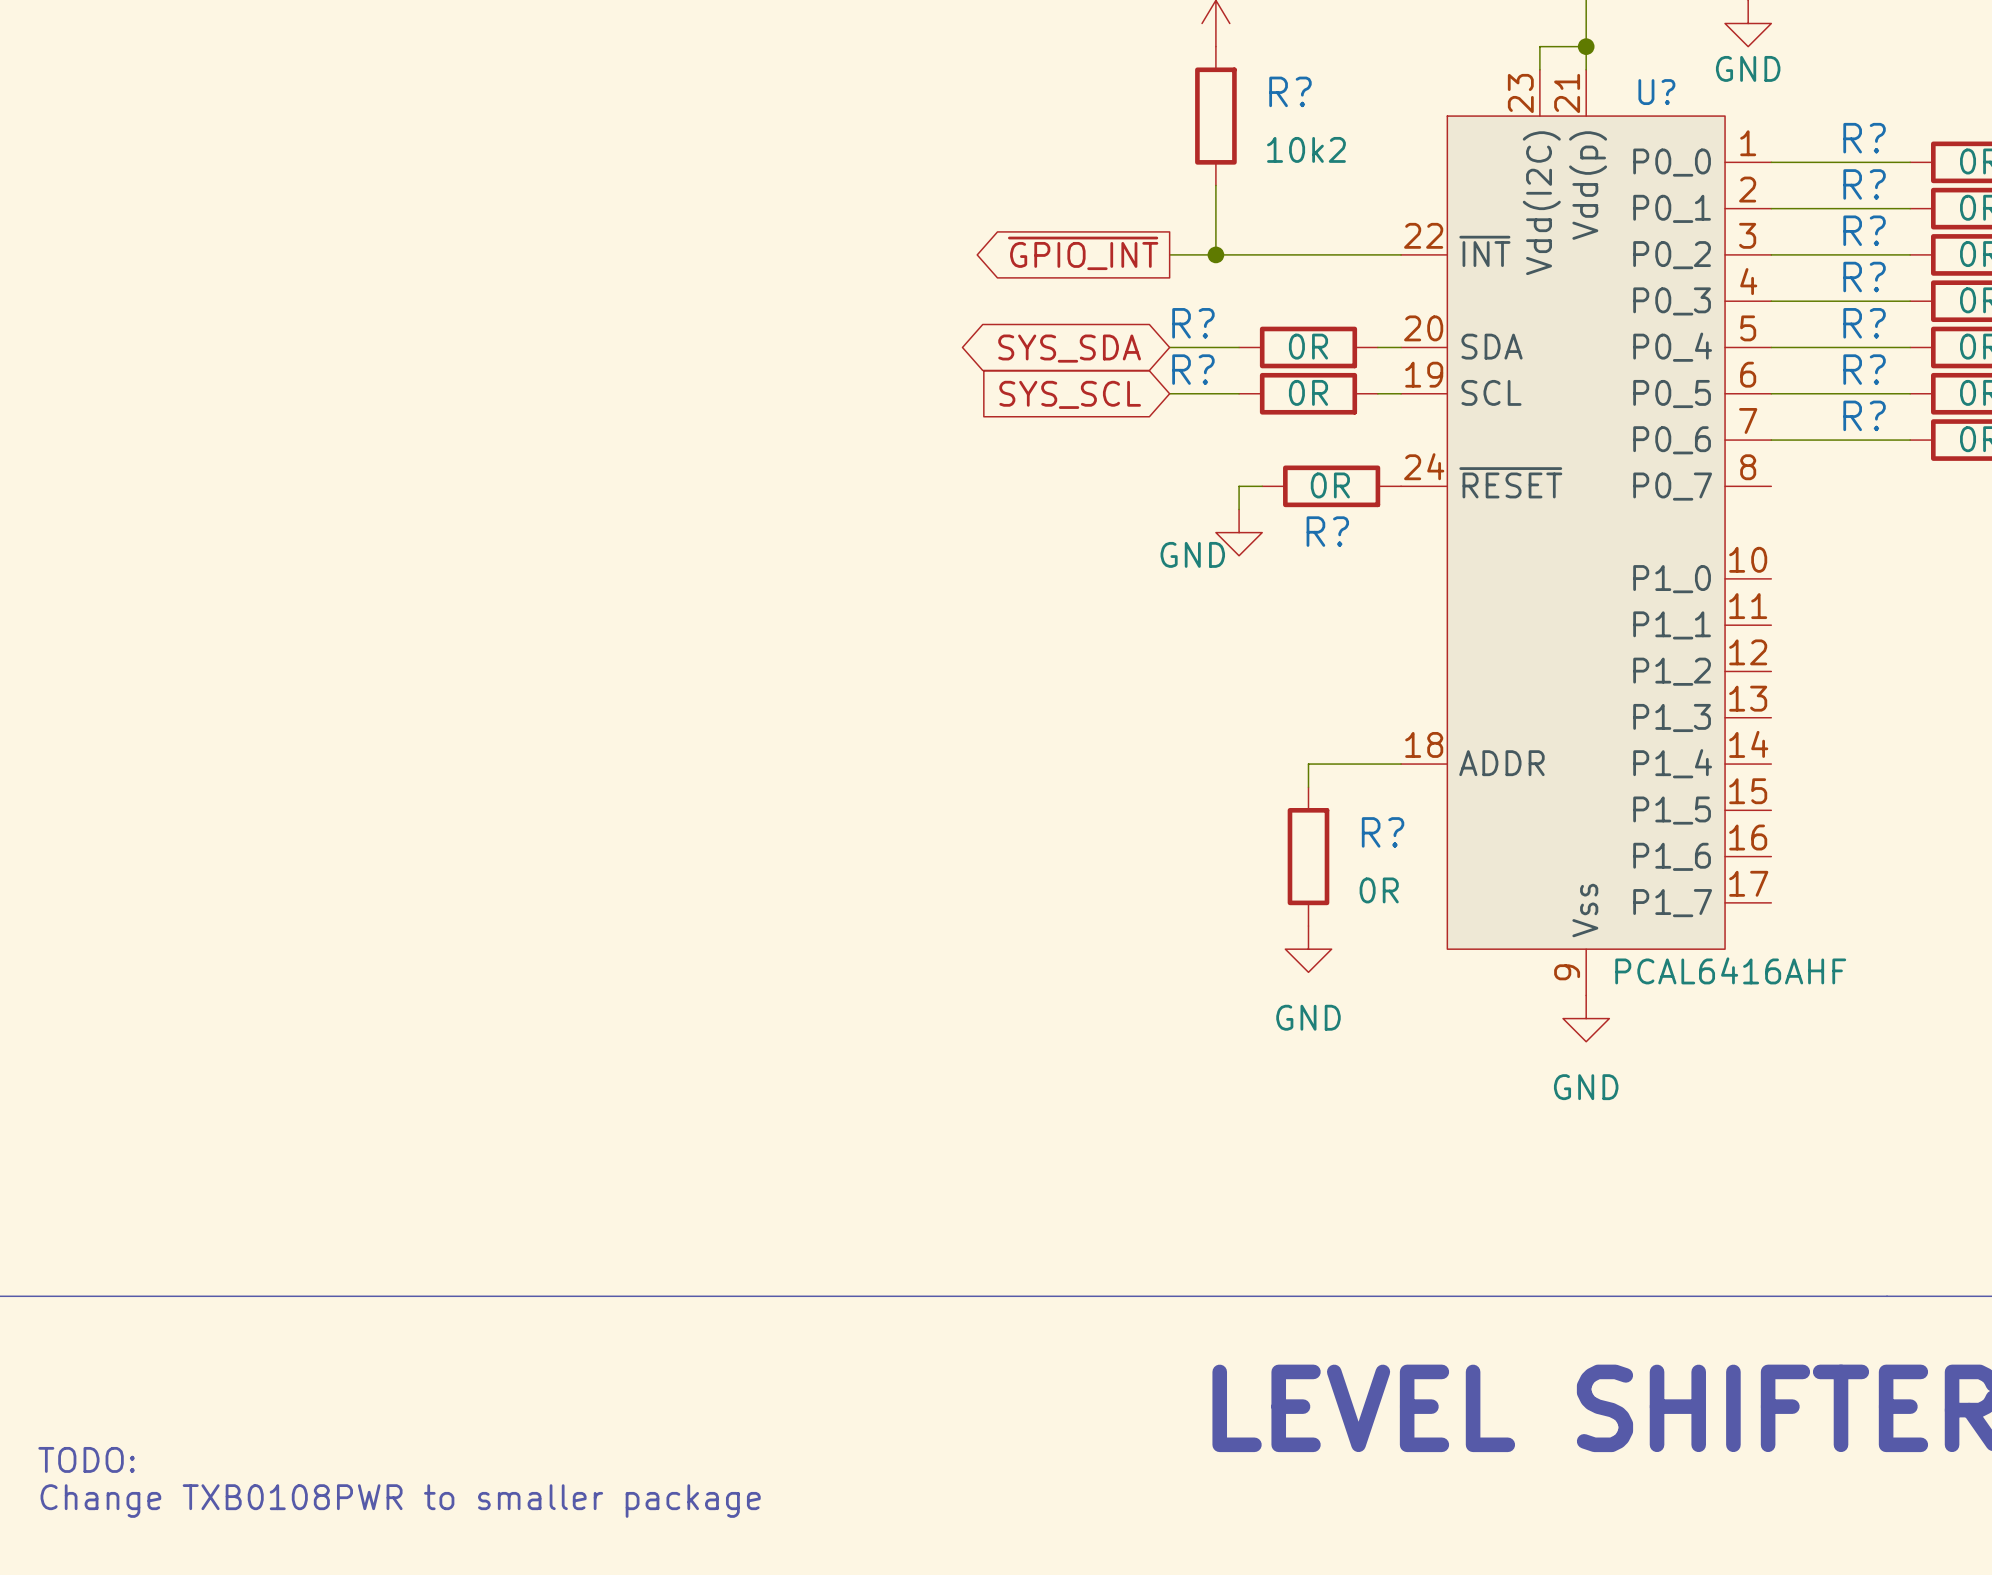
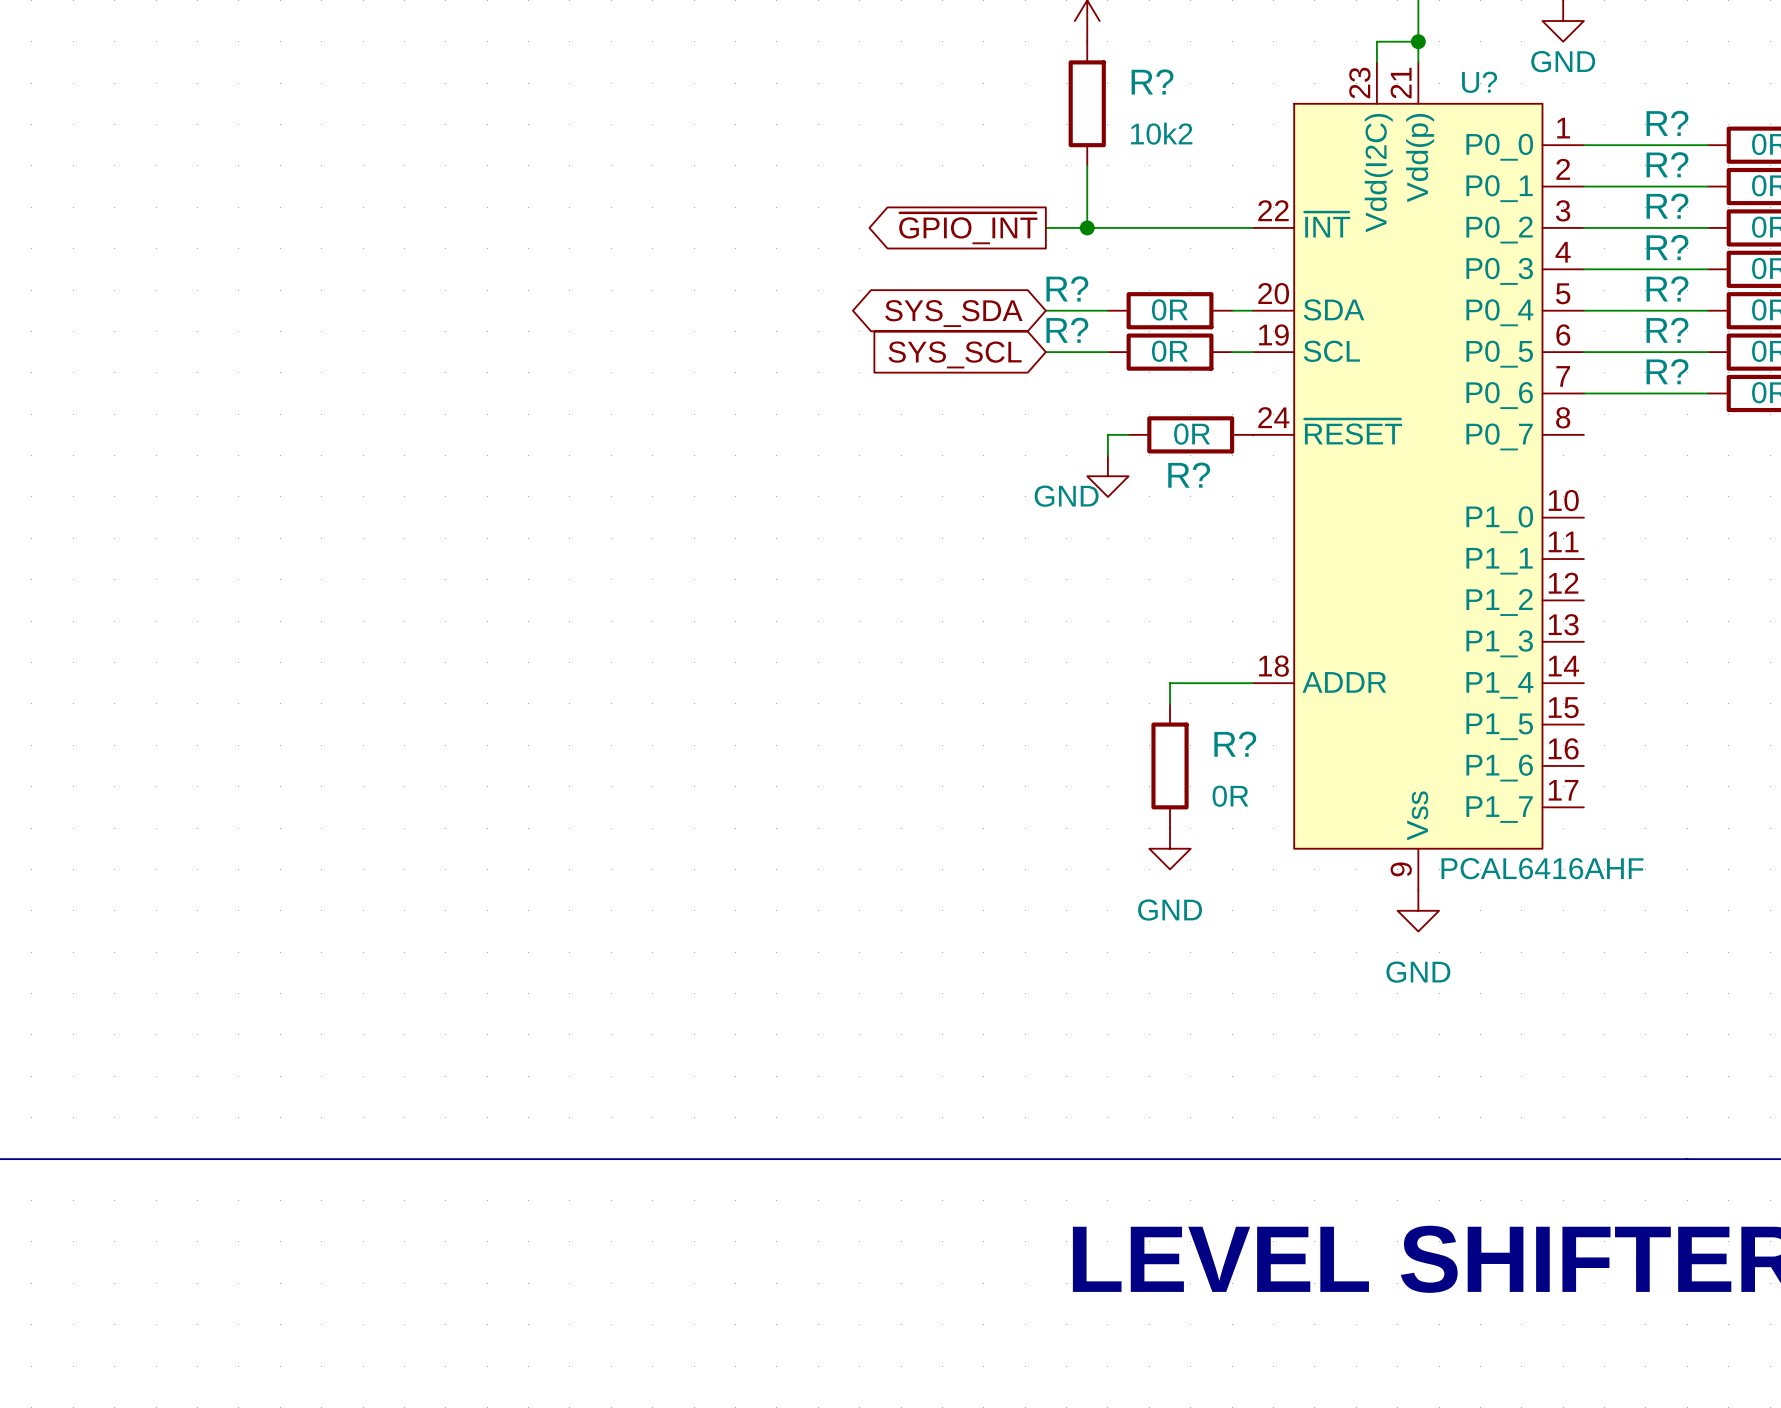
text: TODO: (86, 1459) -> none
text: Change TXB0108PWR to smaller package (400, 1501) -> none

